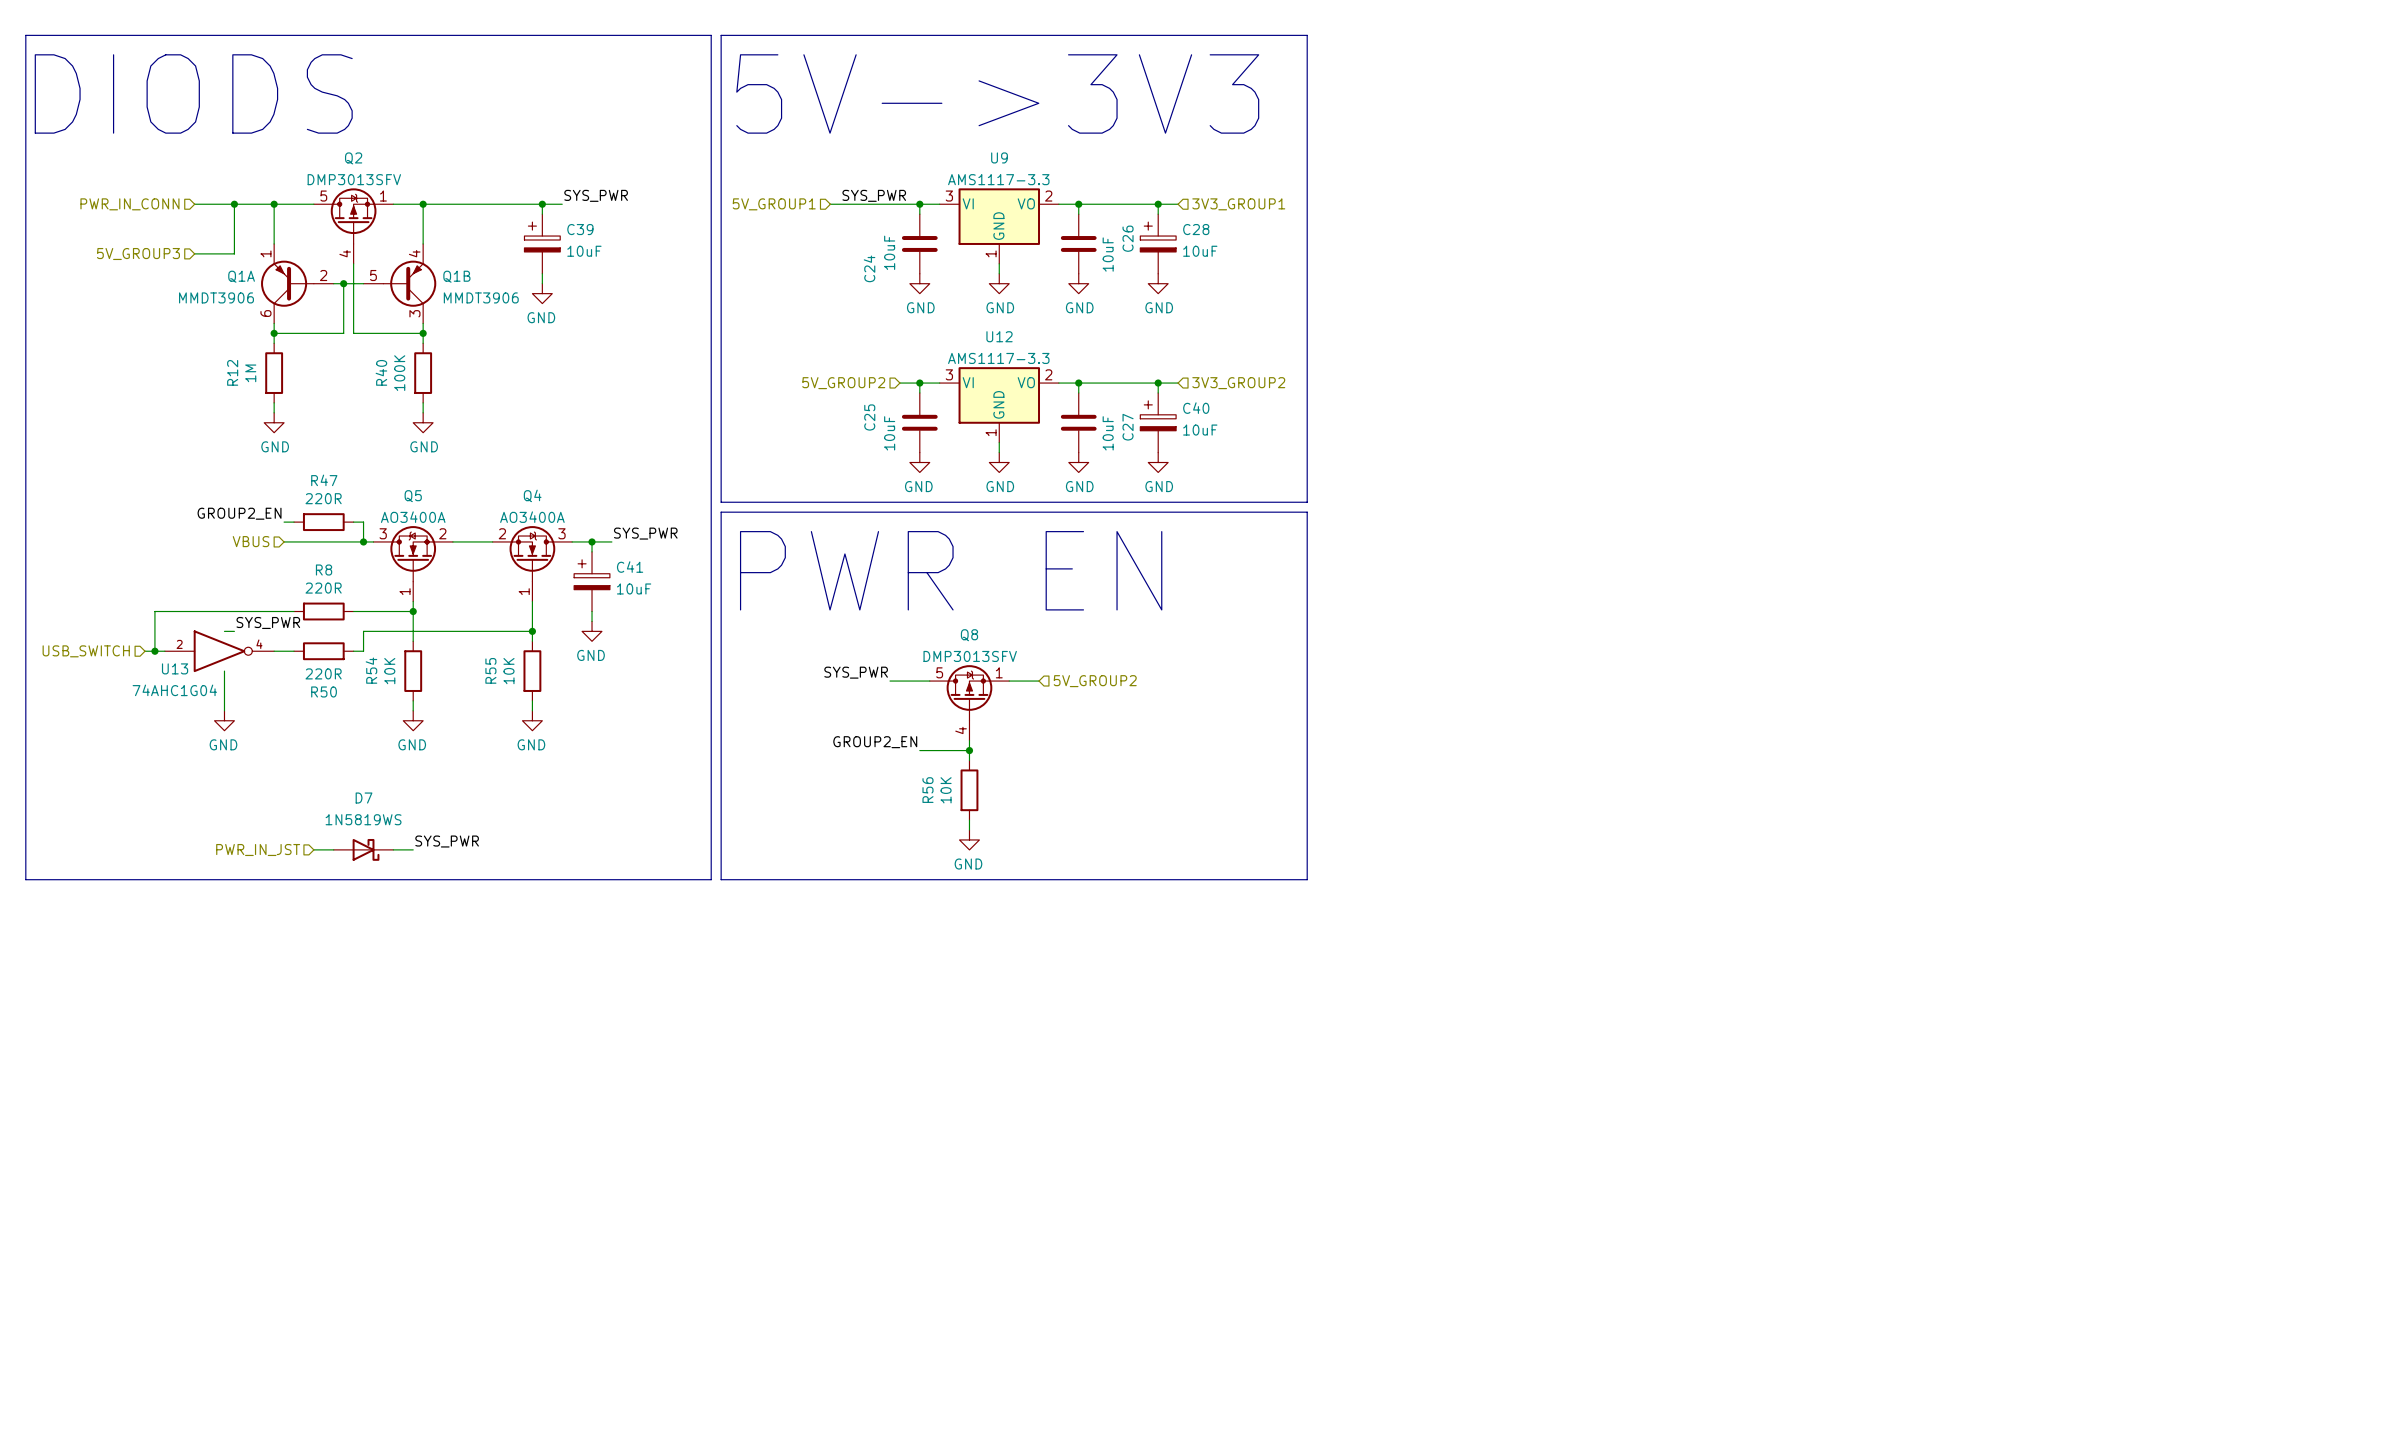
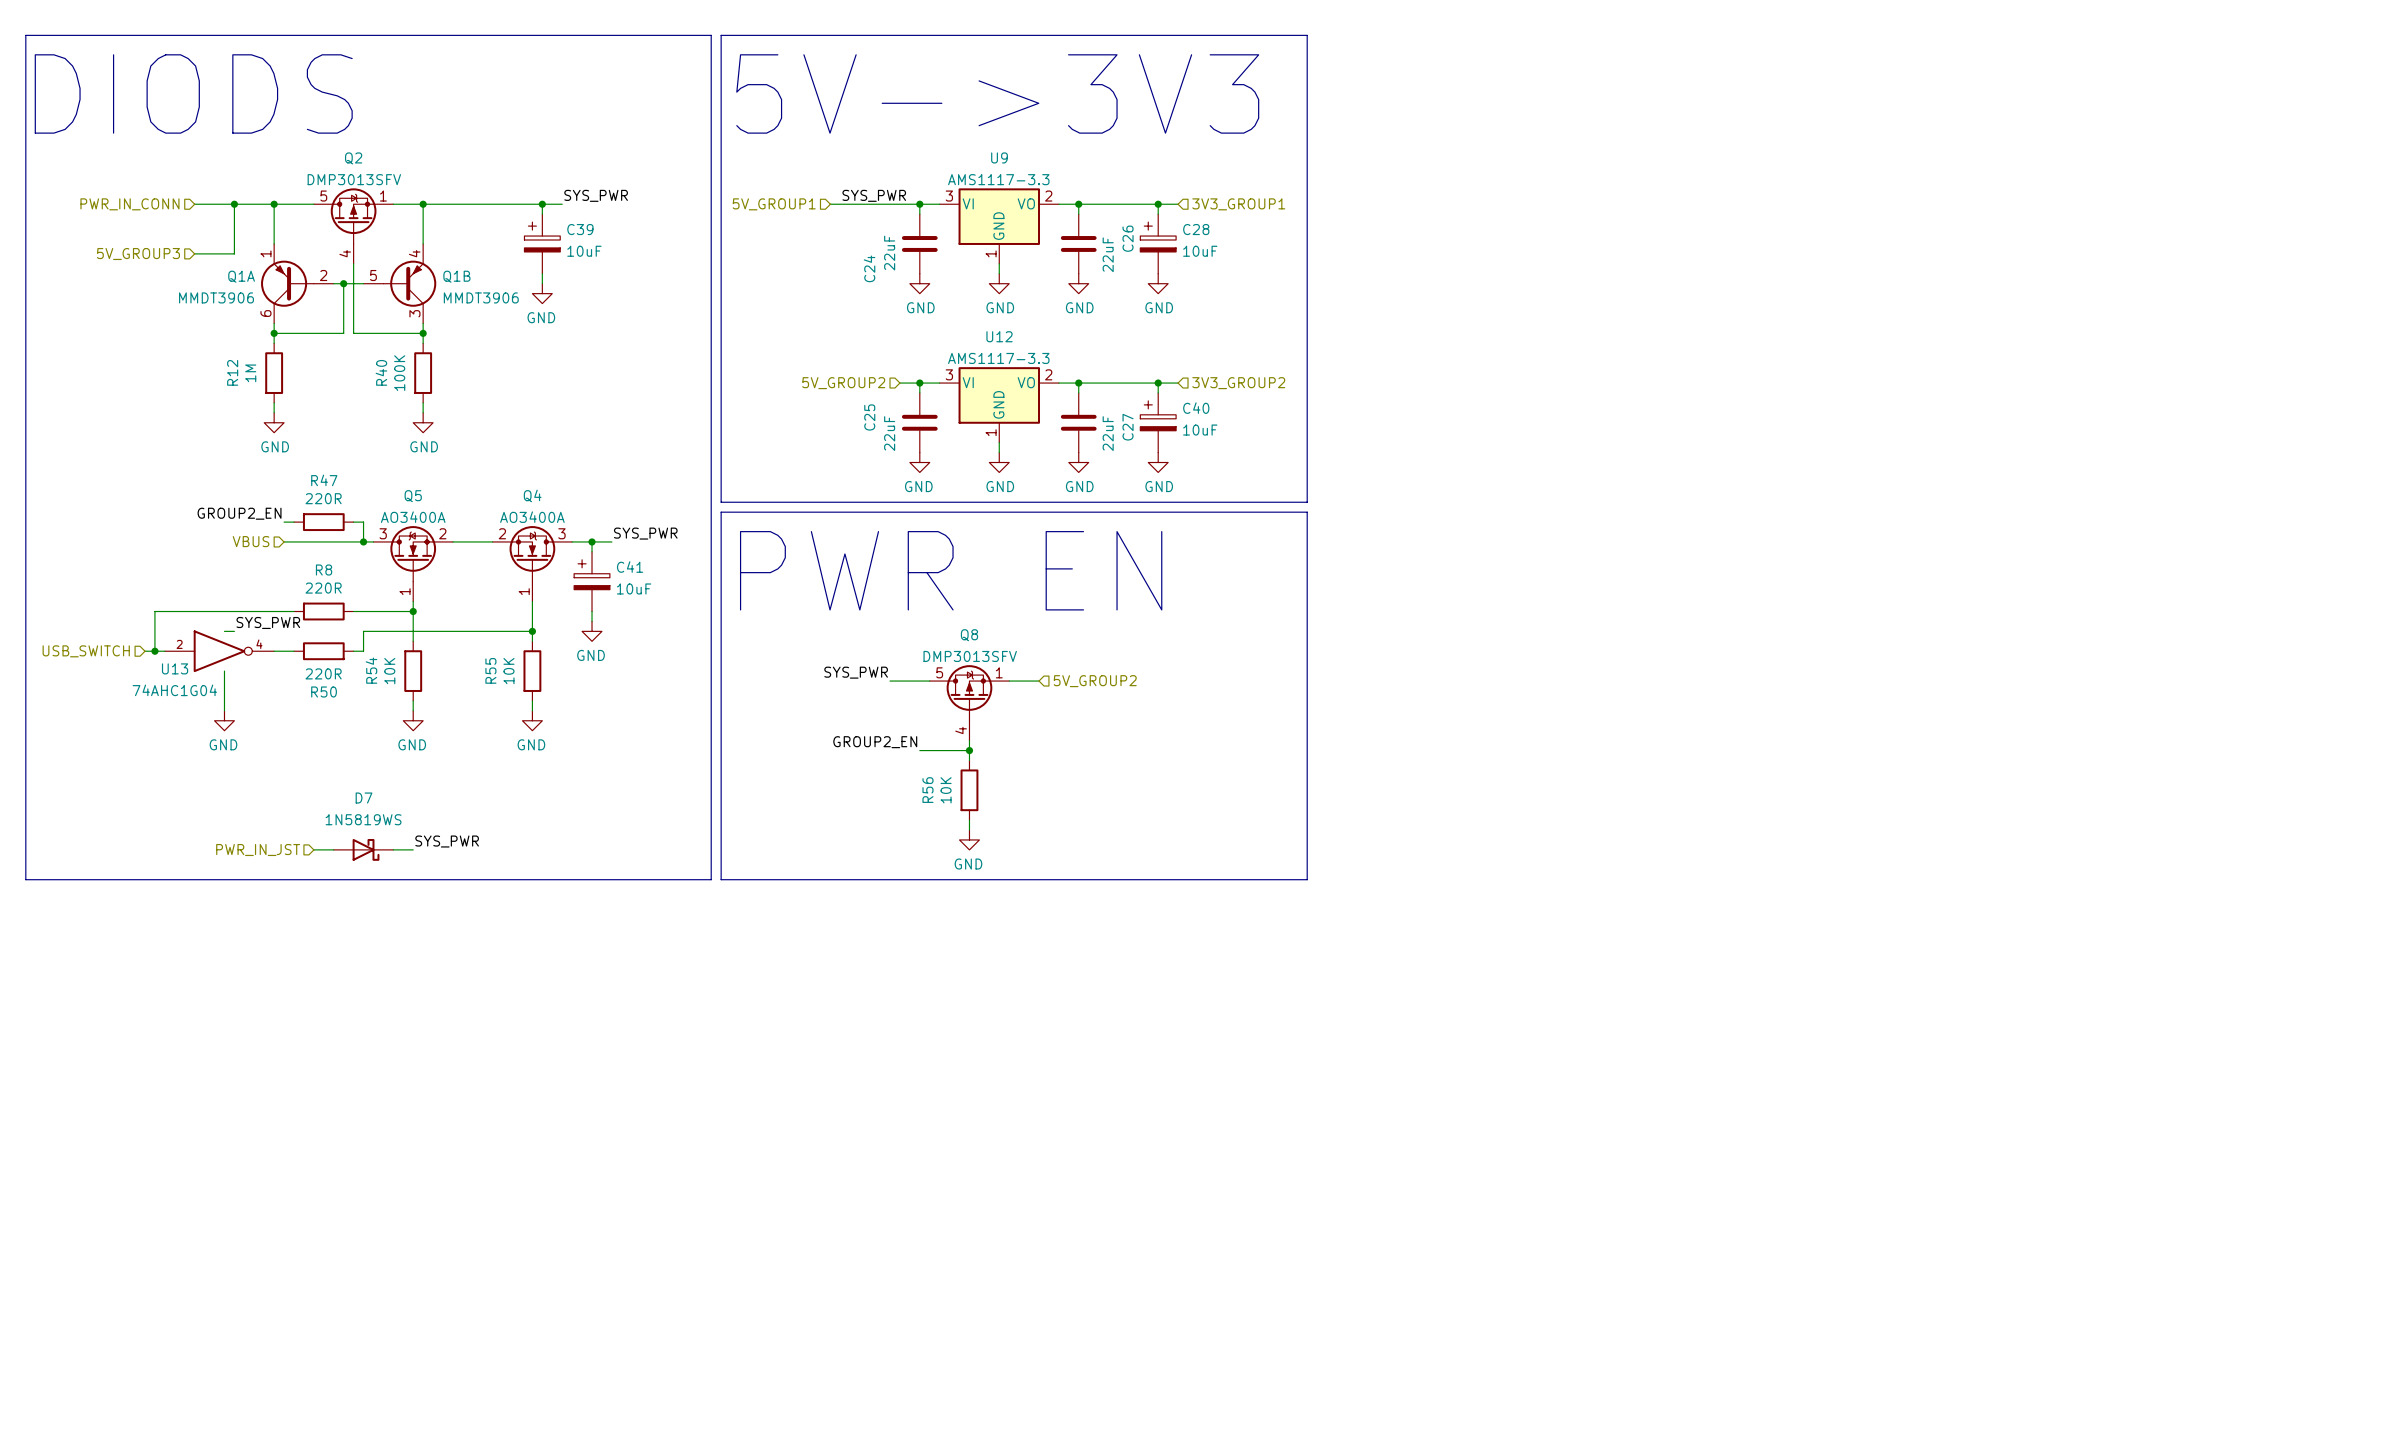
C24 value: 10uF (889, 252) -> 22uF (889, 253)
C26 value: 10uF (1108, 254) -> 22uF (1108, 254)
C25 value: 10uF (889, 433) -> 22uF (889, 433)
C27 value: 10uF (1108, 433) -> 22uF (1108, 433)

